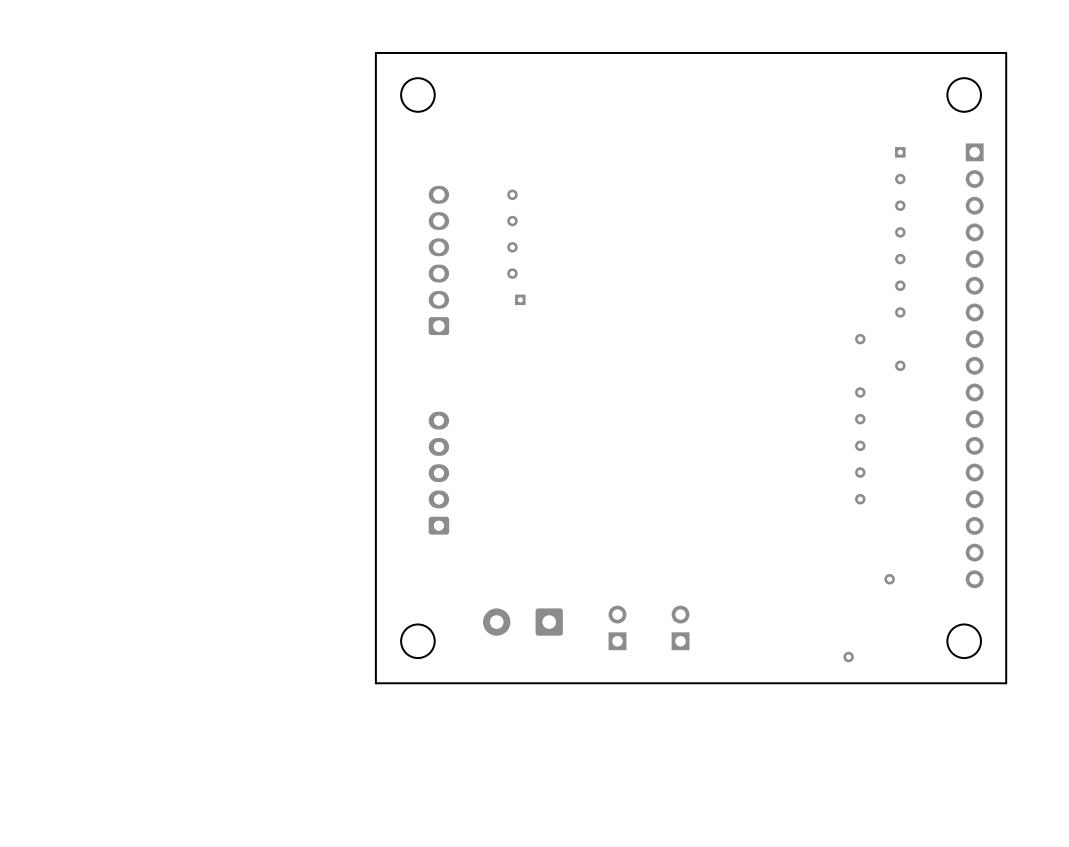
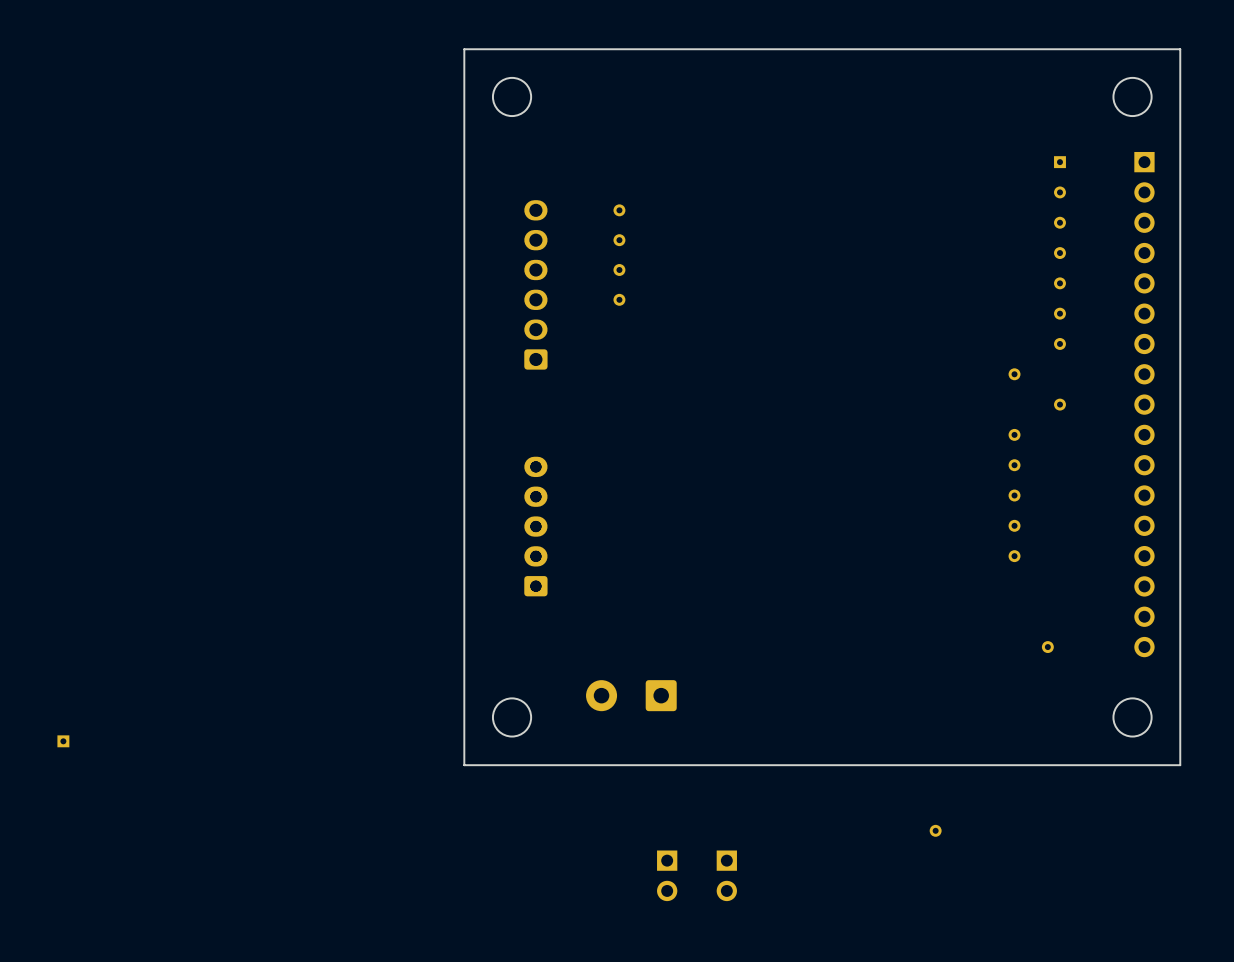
part: (520, 299) -> none
part: (617, 627) -> none
part: (680, 627) -> none
part position: (848, 657) -> (935, 830)
part: none -> (63, 741)
part: none -> (667, 875)
part: none -> (726, 875)

